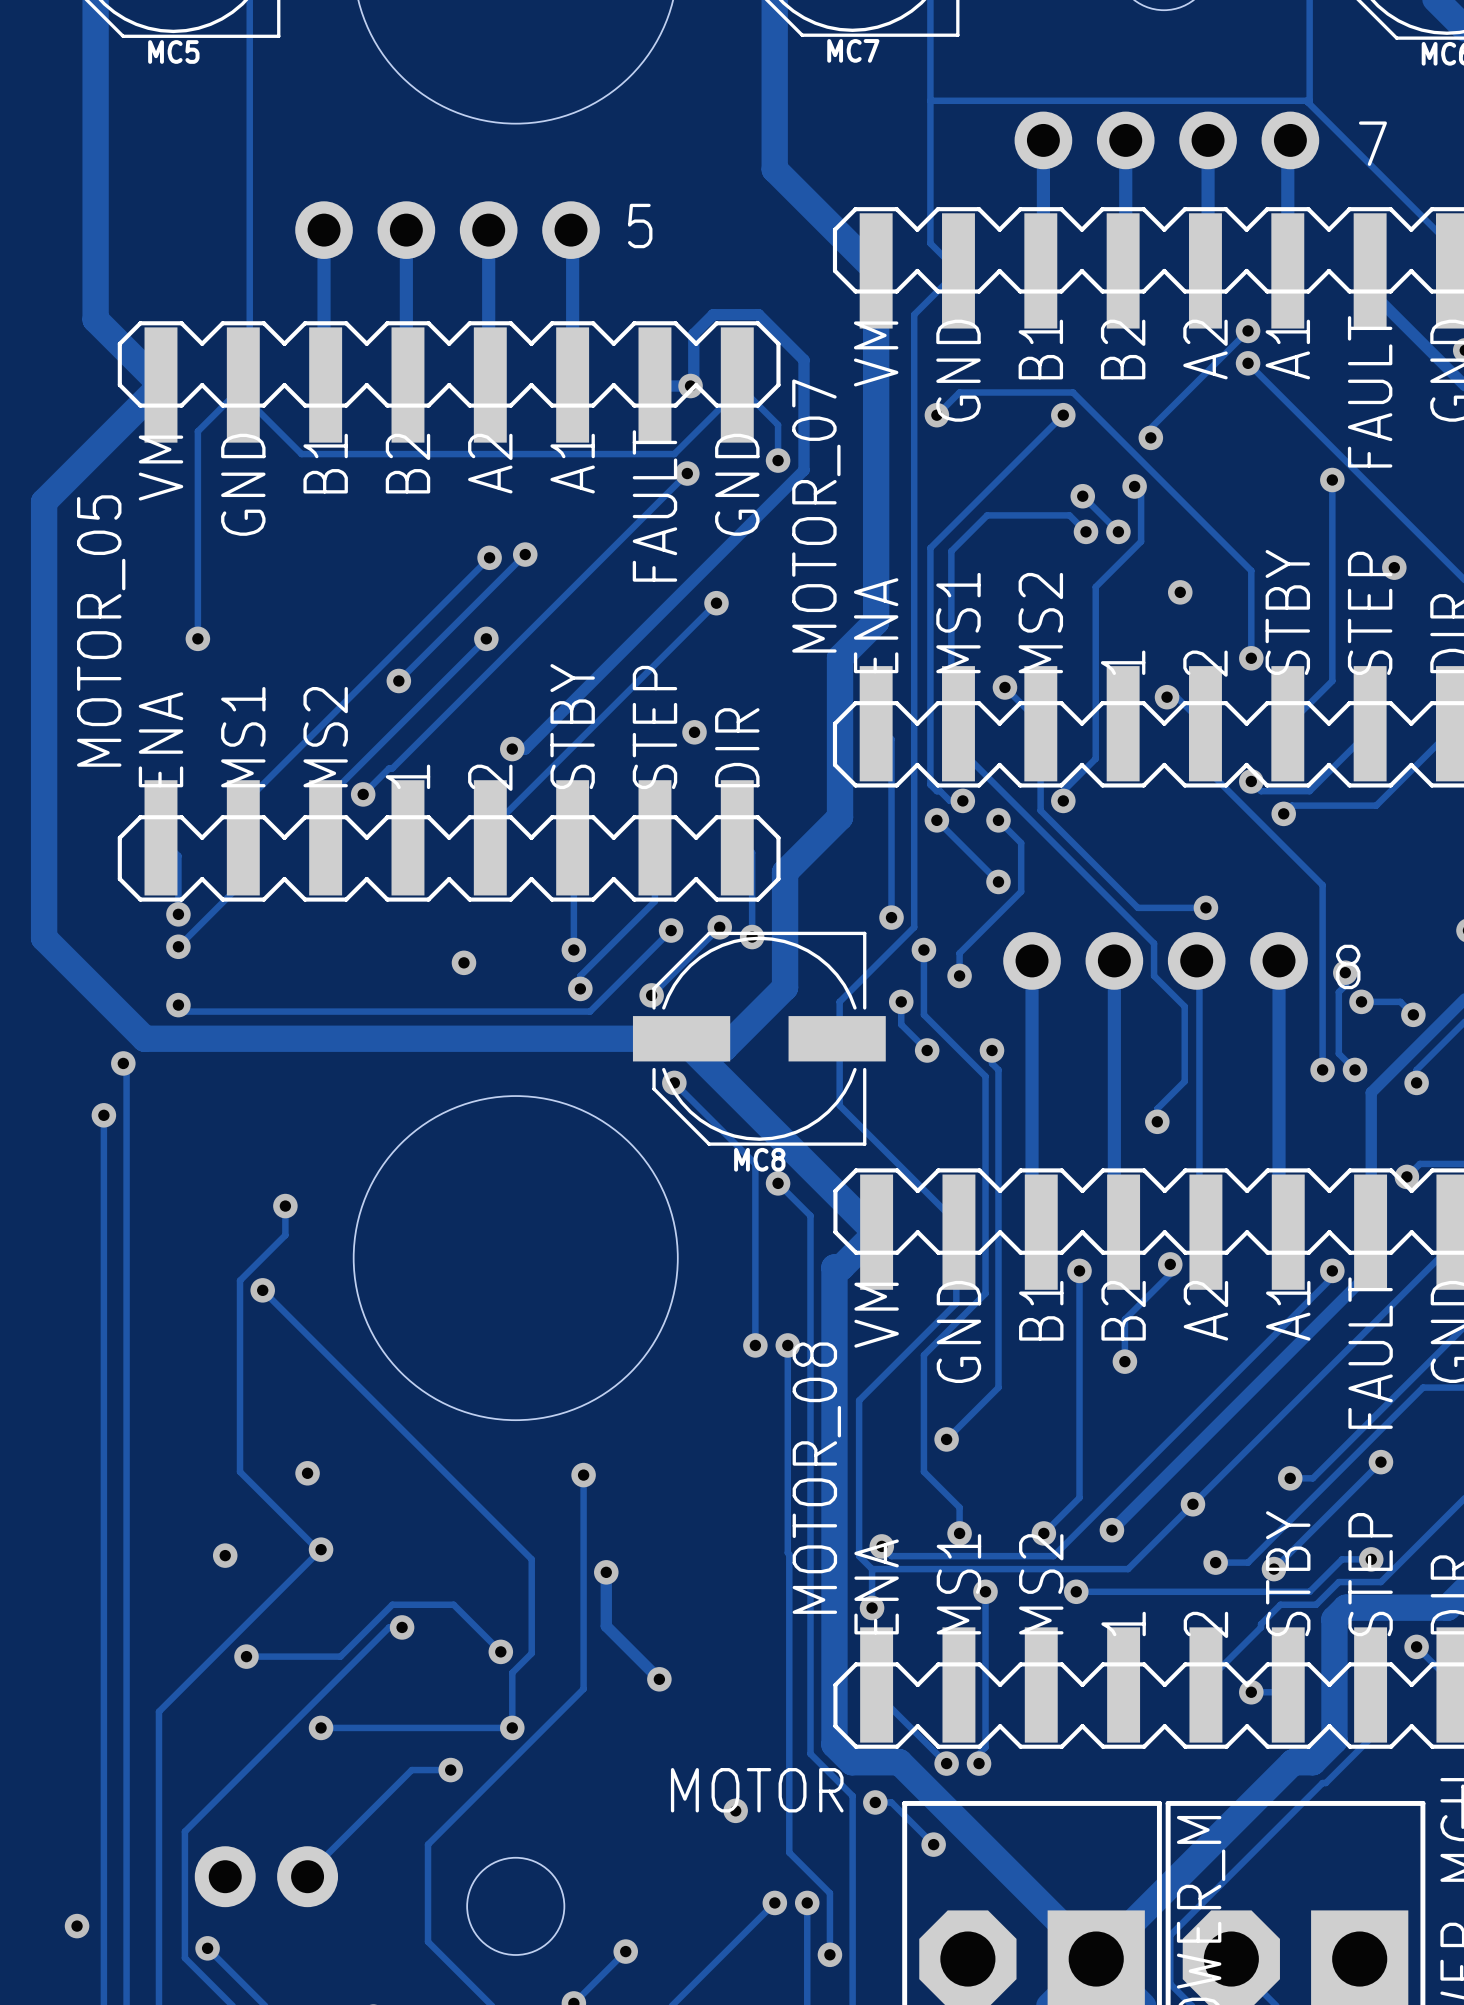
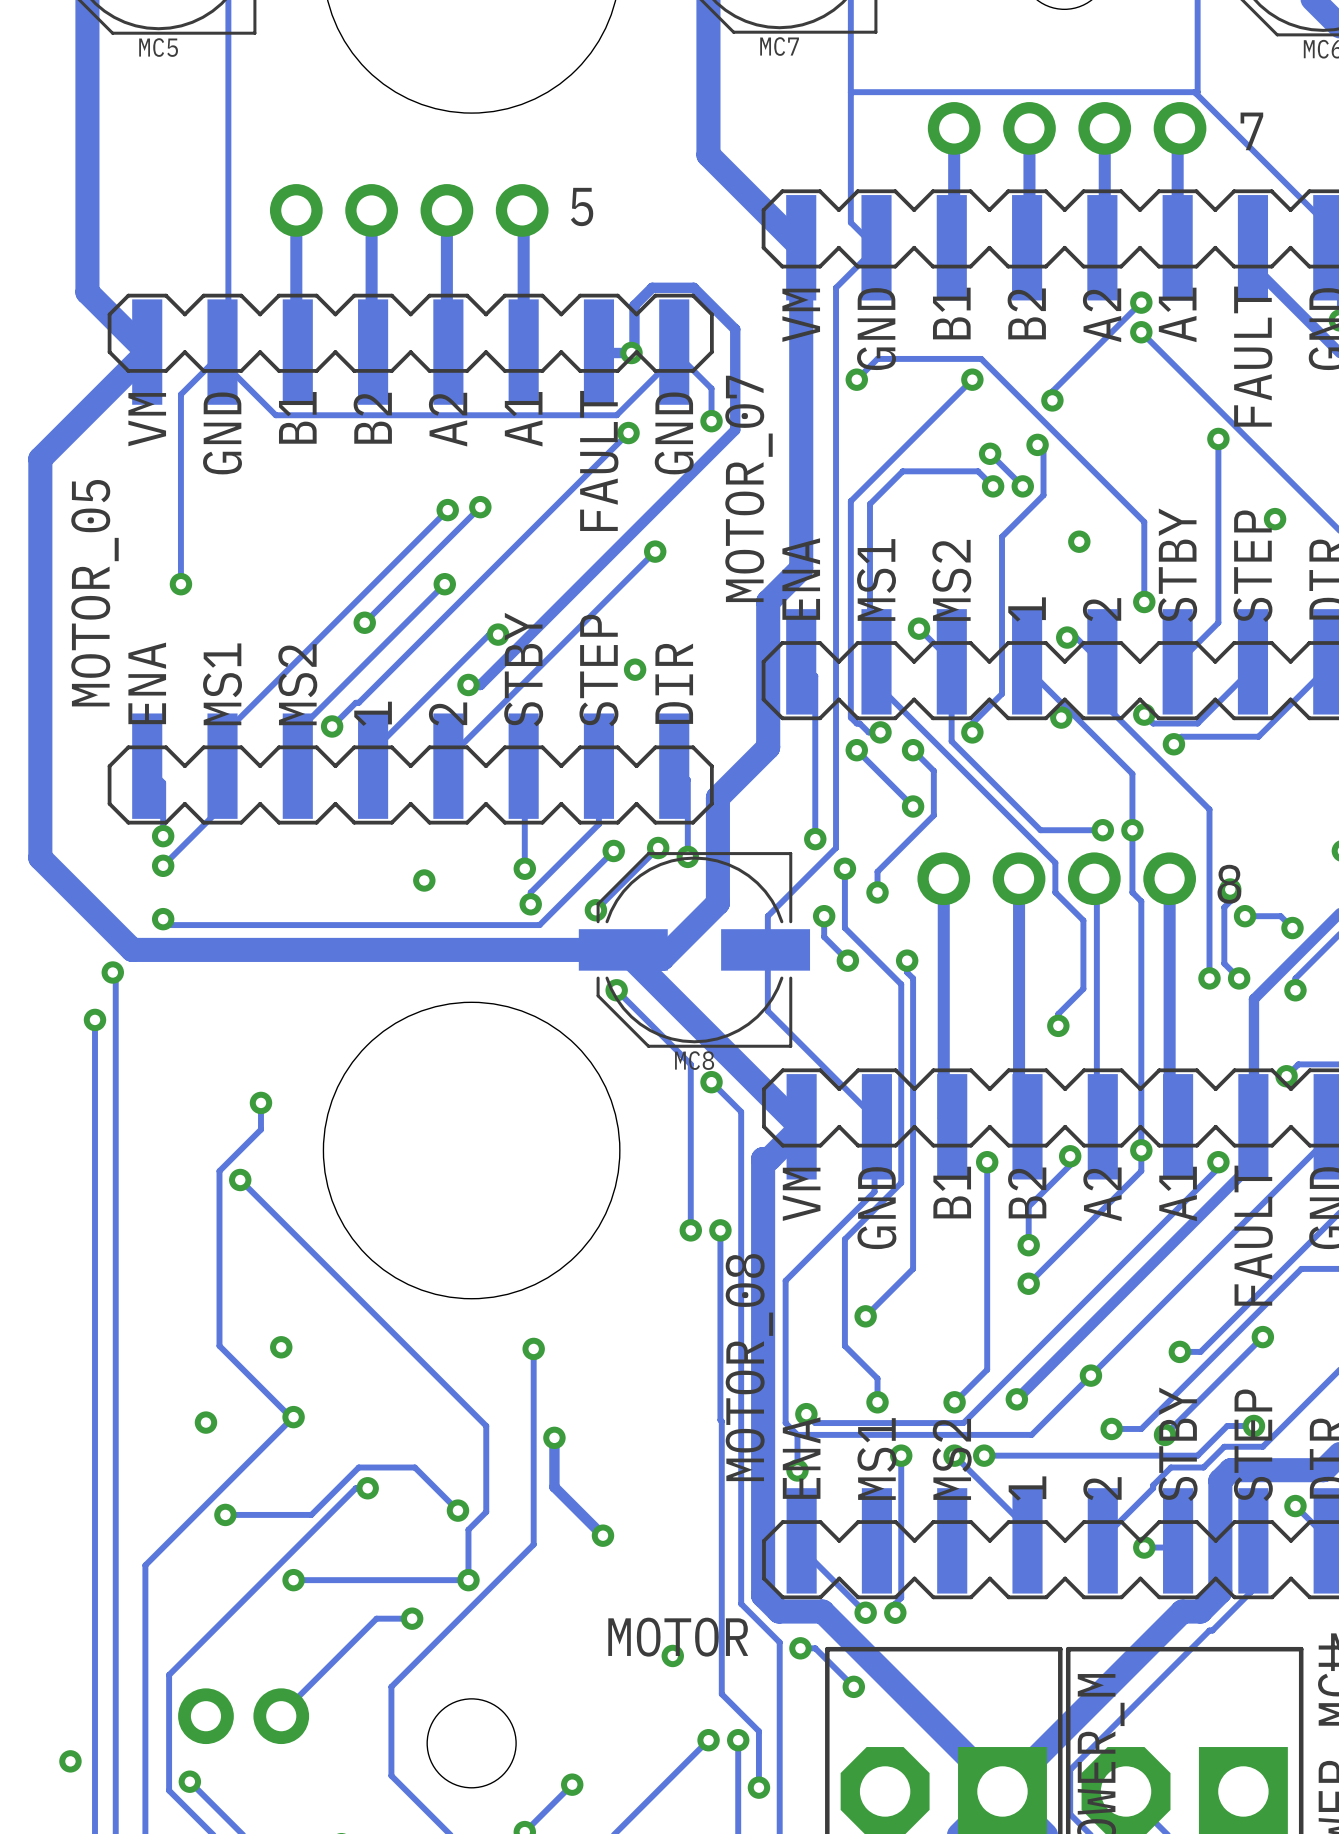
track: none -> (498, 634) (489, 634) (373, 750) (373, 766)
via: none -> (498, 634)
track: none -> (1027, 661) (1028, 670) (1132, 773) (1132, 892) (1141, 901) (1141, 1171) (1028, 1283)
via: none -> (1061, 717)
via: none -> (1132, 830)
via: none -> (1141, 1150)
via: none -> (1028, 1283)
track: none -> (954, 1455) (1025, 1526) (1027, 1540)
via: none -> (954, 1455)

